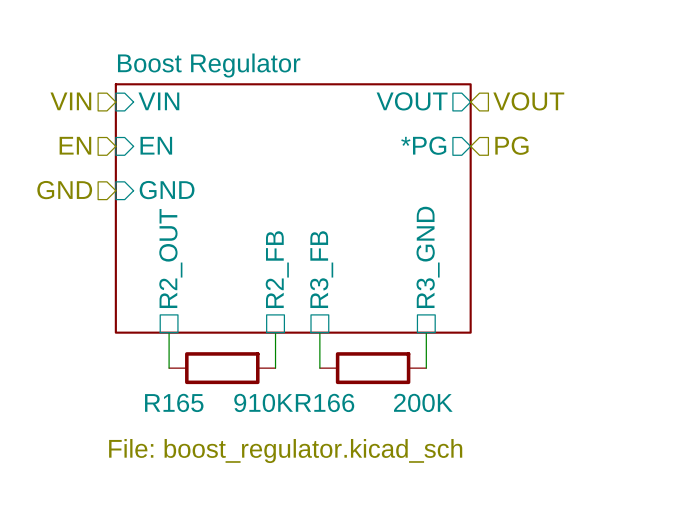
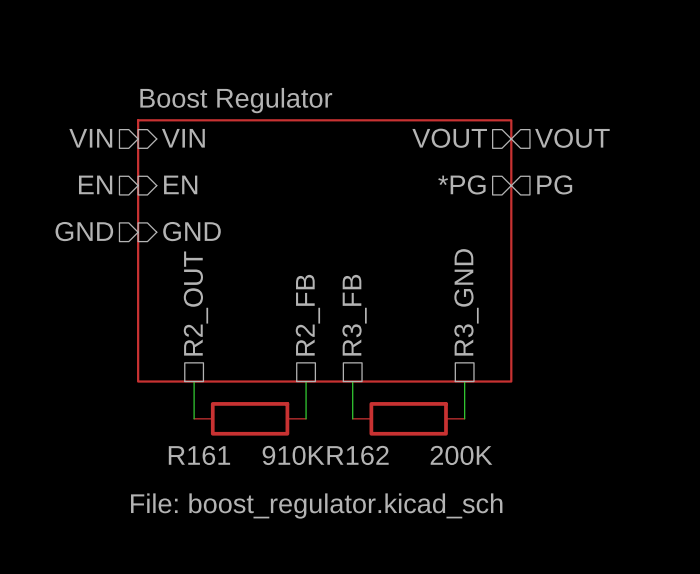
R165 name: R165 (174, 402) -> R161 (199, 455)
R166 name: R166 (325, 402) -> R162 (358, 455)

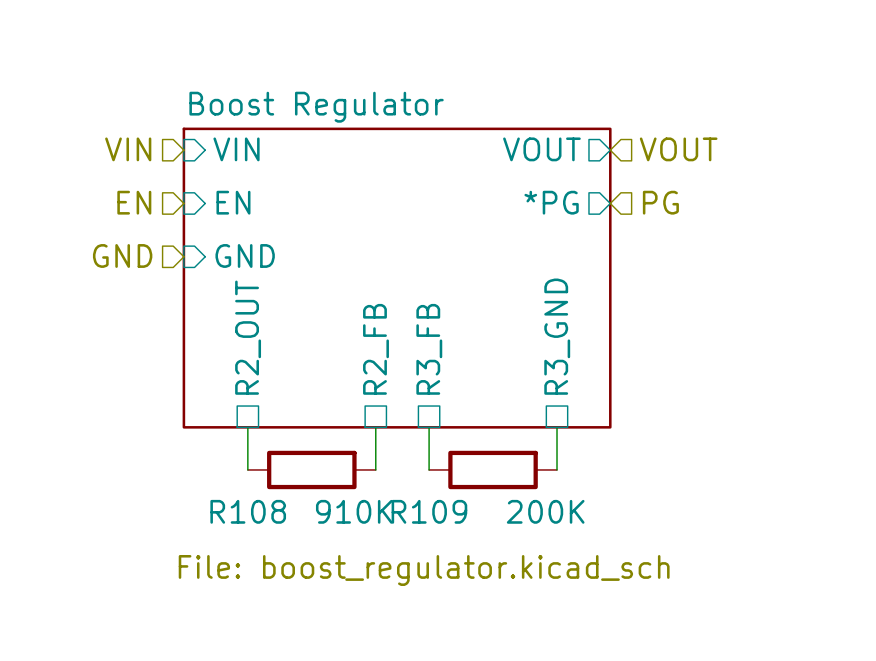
R161 name: R161 (199, 455) -> R108 (248, 511)
R162 name: R162 (358, 455) -> R109 (429, 511)

